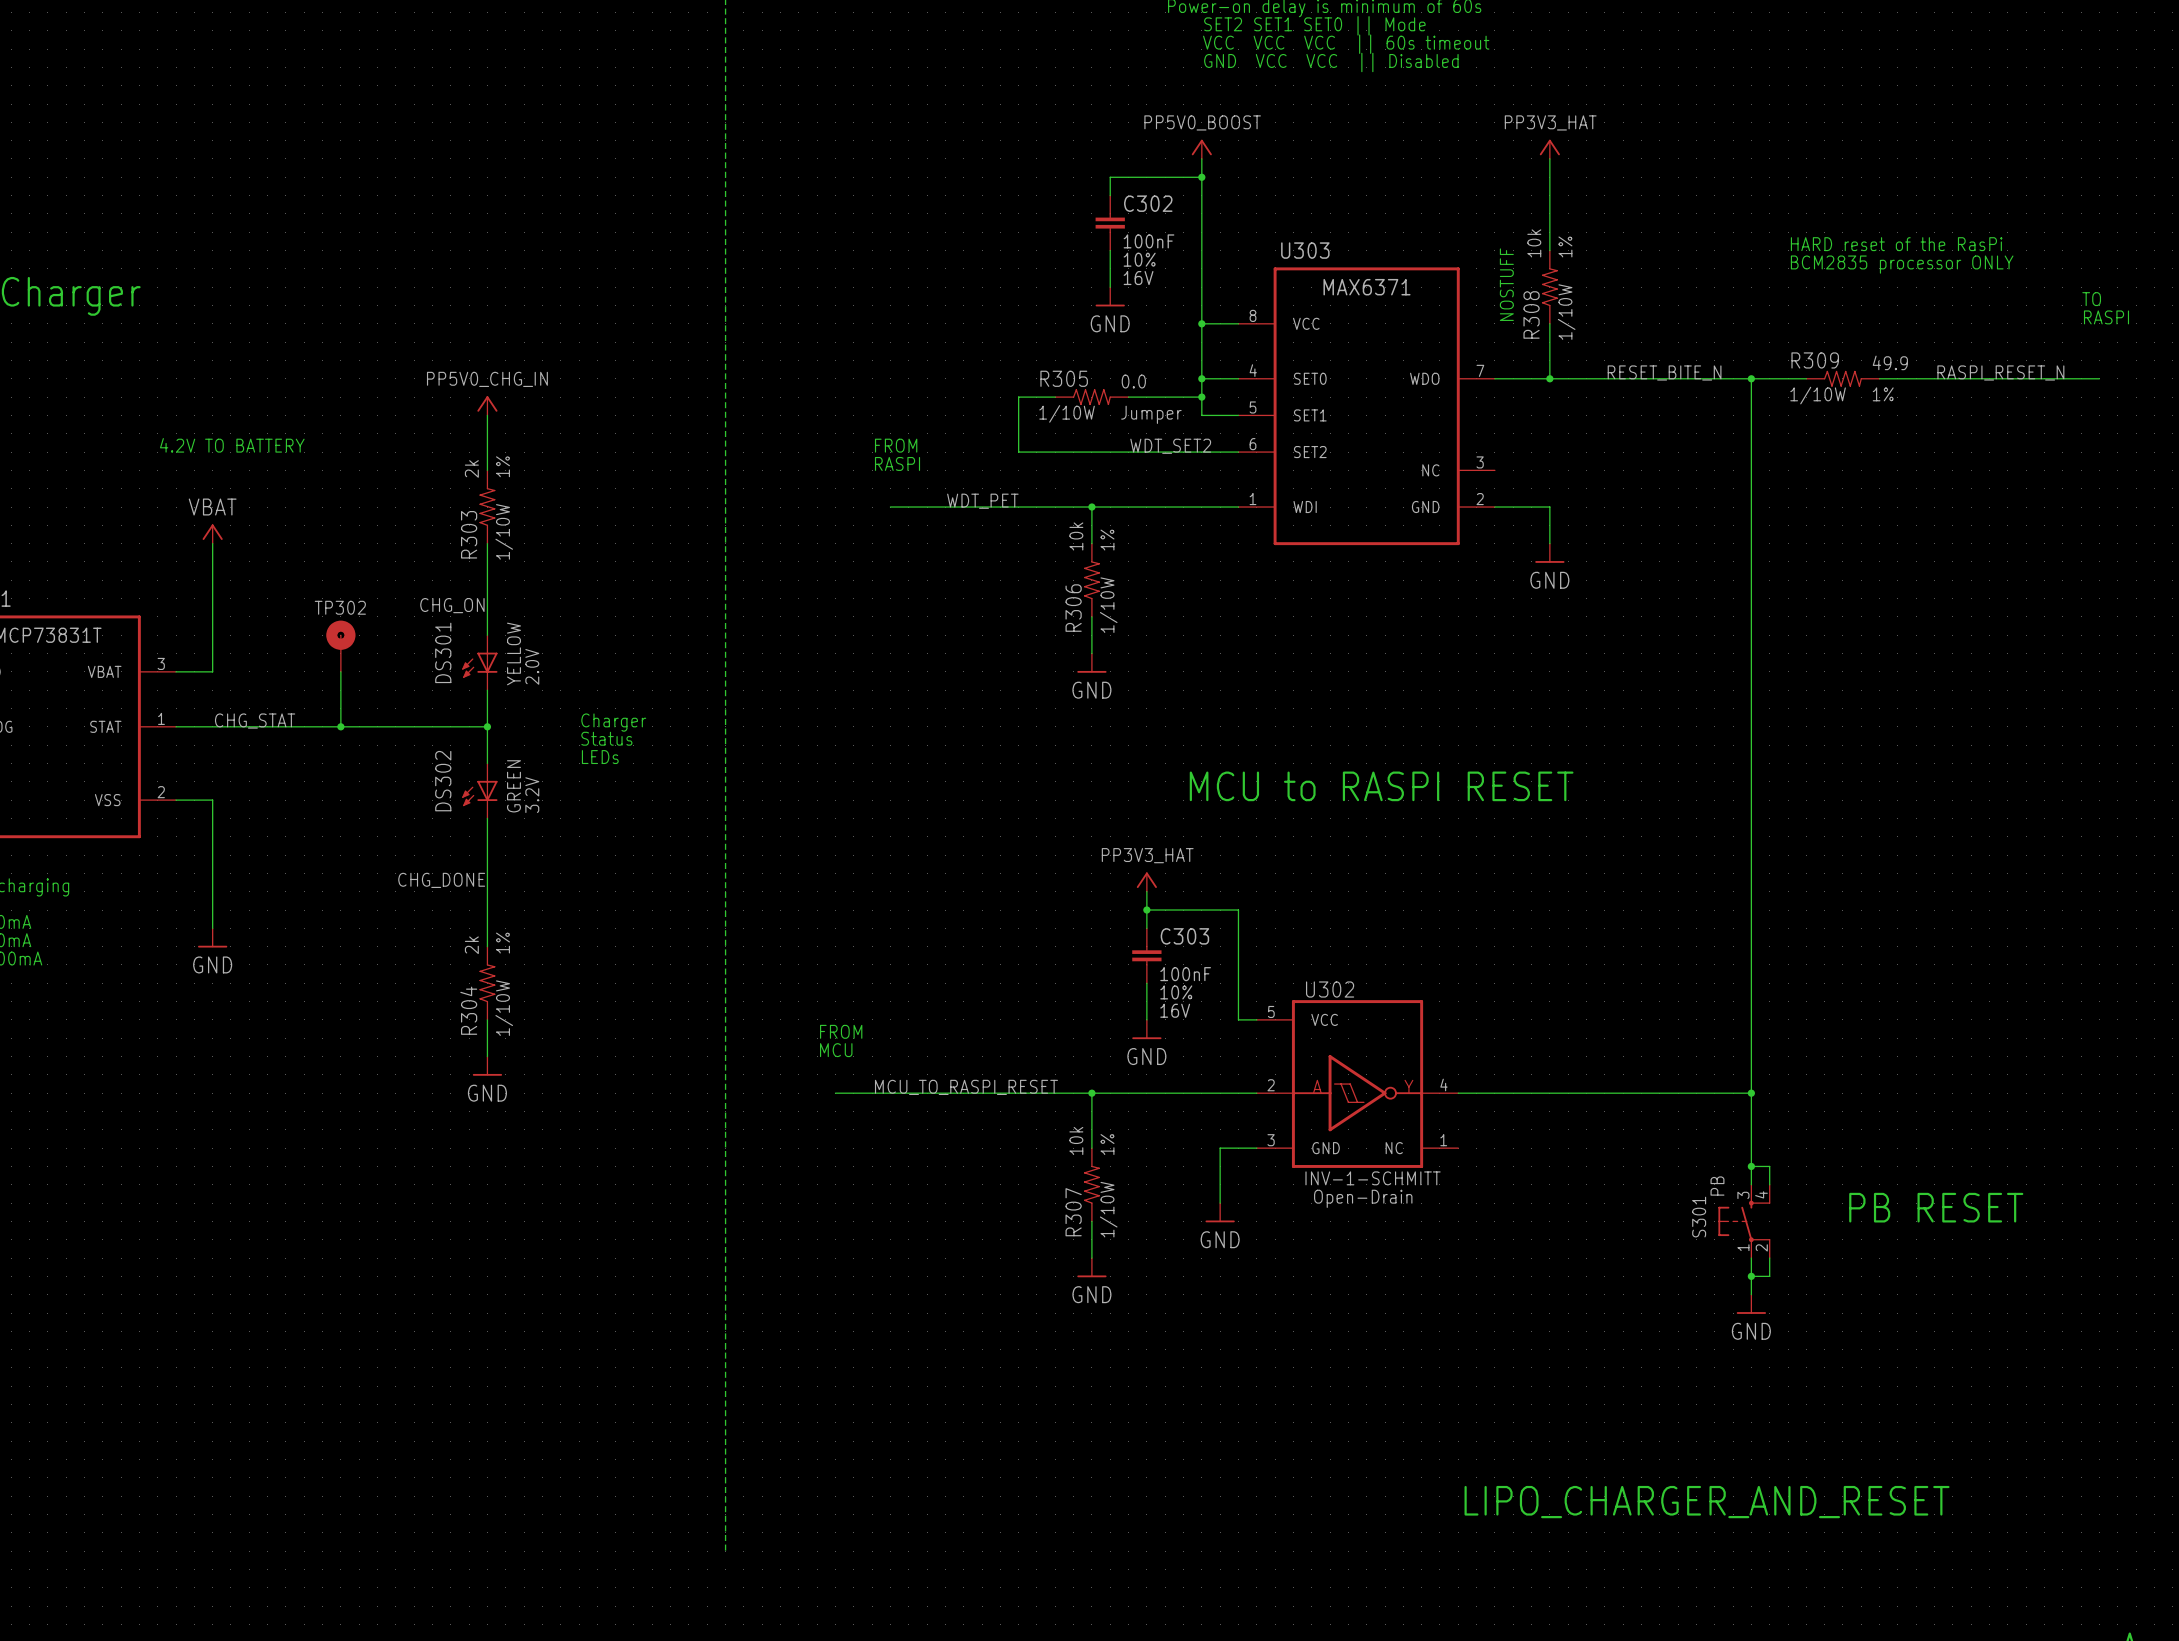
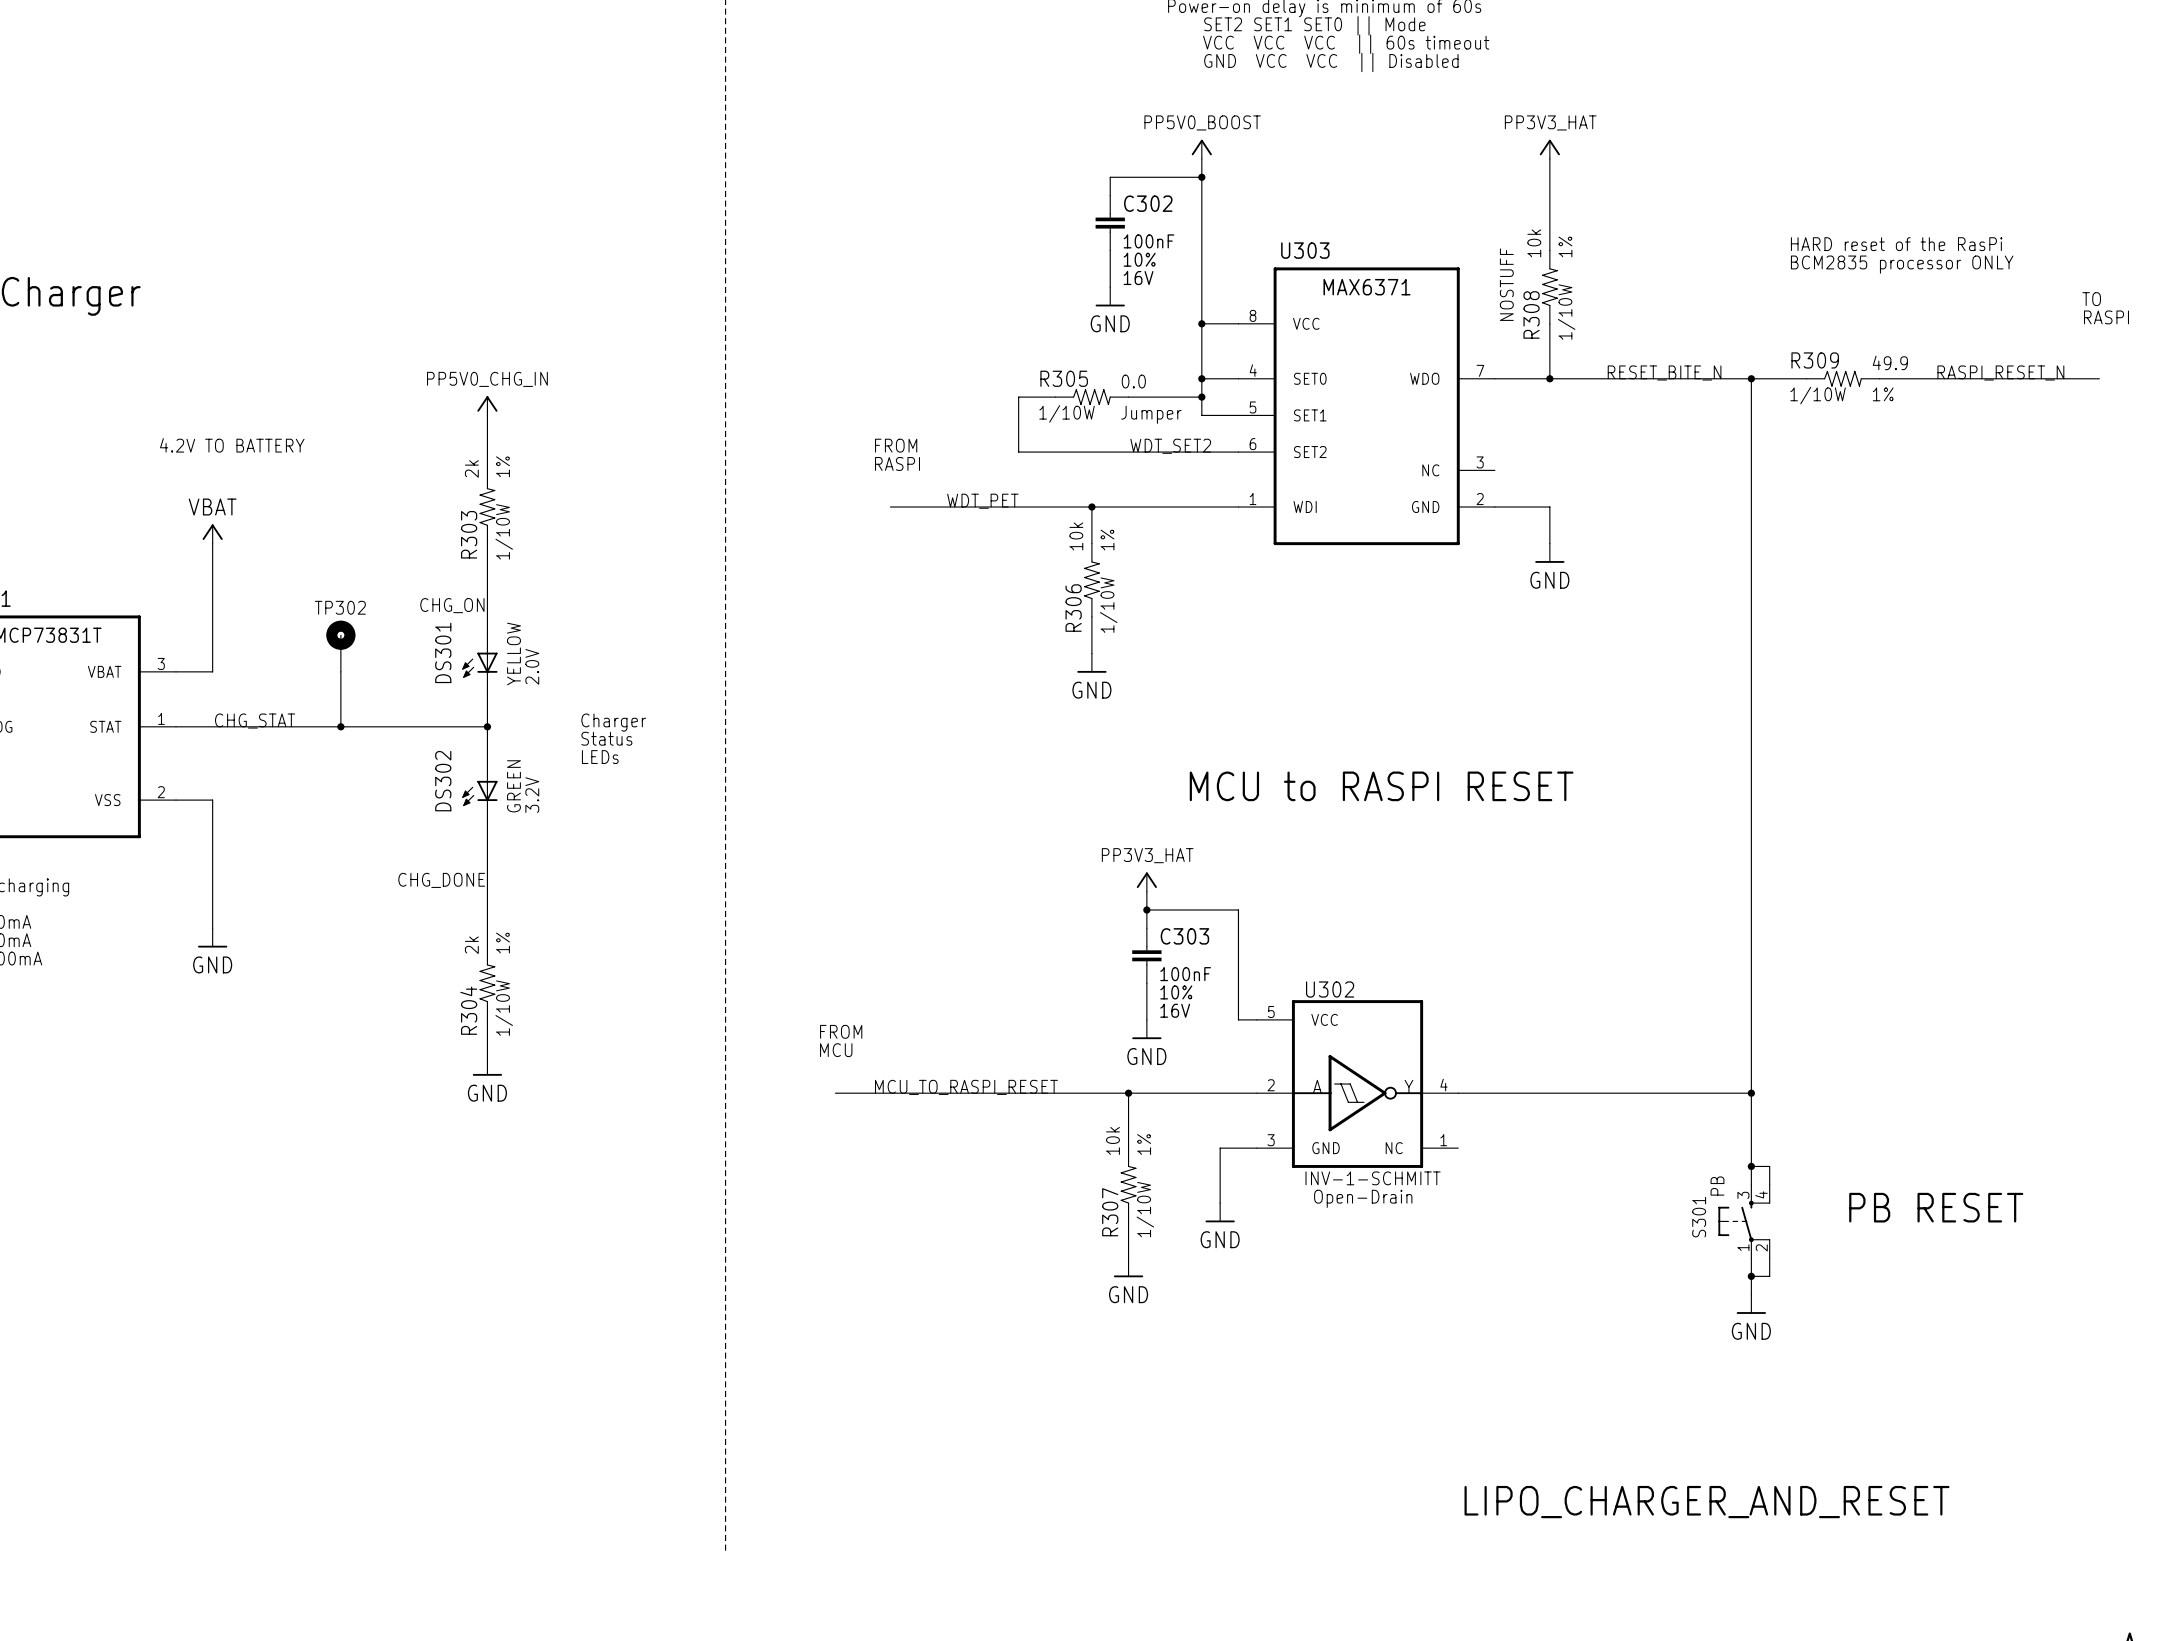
wire: (1091, 1093) (1091, 1148) -> (1128, 1093) (1128, 1148)
junction position: (1091, 1093) -> (1128, 1093)
R307 position: (1091, 1184) -> (1128, 1184)
wire: (1091, 1221) (1091, 1258) -> (1128, 1221) (1128, 1258)
power symbol position: GND (1091, 1267) -> GND (1128, 1267)

